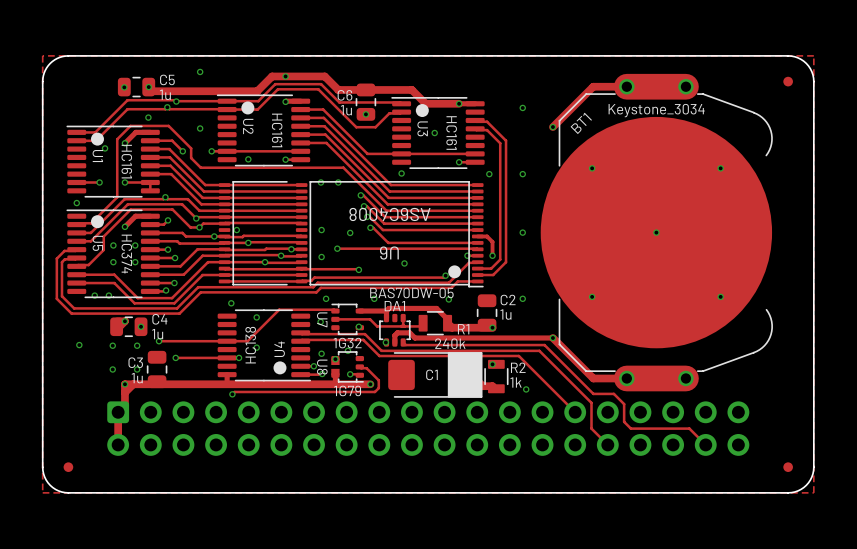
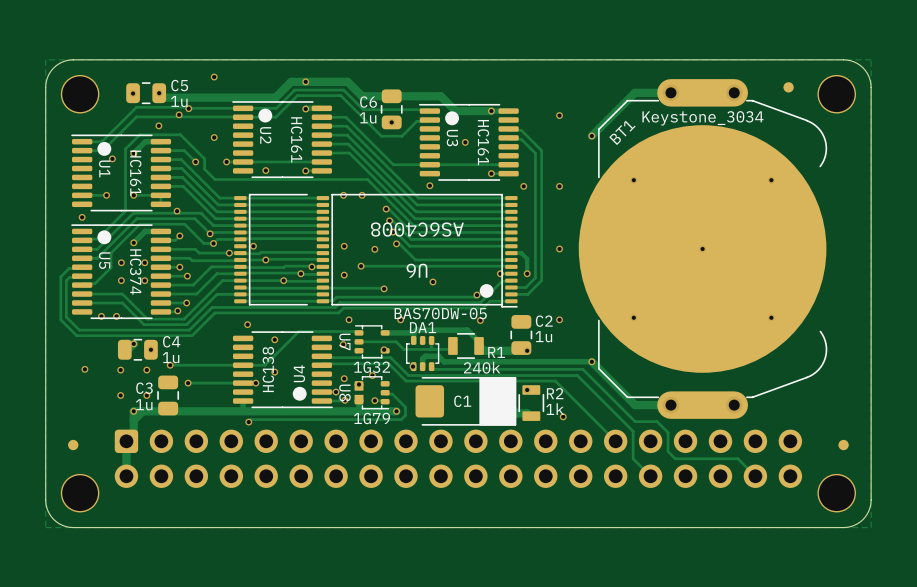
part footprint: [783, 76, 793, 87] -> [817, 74, 856, 114]
part: none -> (788, 87)
part: none -> (80, 94)
part: none -> (73, 445)
part: none -> (843, 445)
part footprint: [63, 462, 74, 472] -> [60, 473, 100, 513]
part footprint: [783, 462, 793, 472] -> [817, 473, 856, 513]

